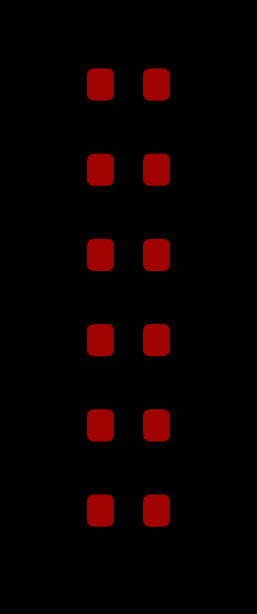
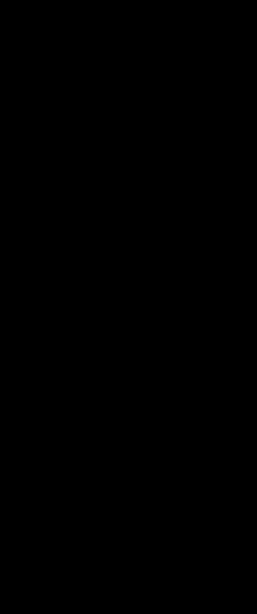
part: (128, 84) -> none
part: (128, 169) -> none
part: (128, 254) -> none
part: (128, 340) -> none
part: (128, 425) -> none
part: (128, 510) -> none

